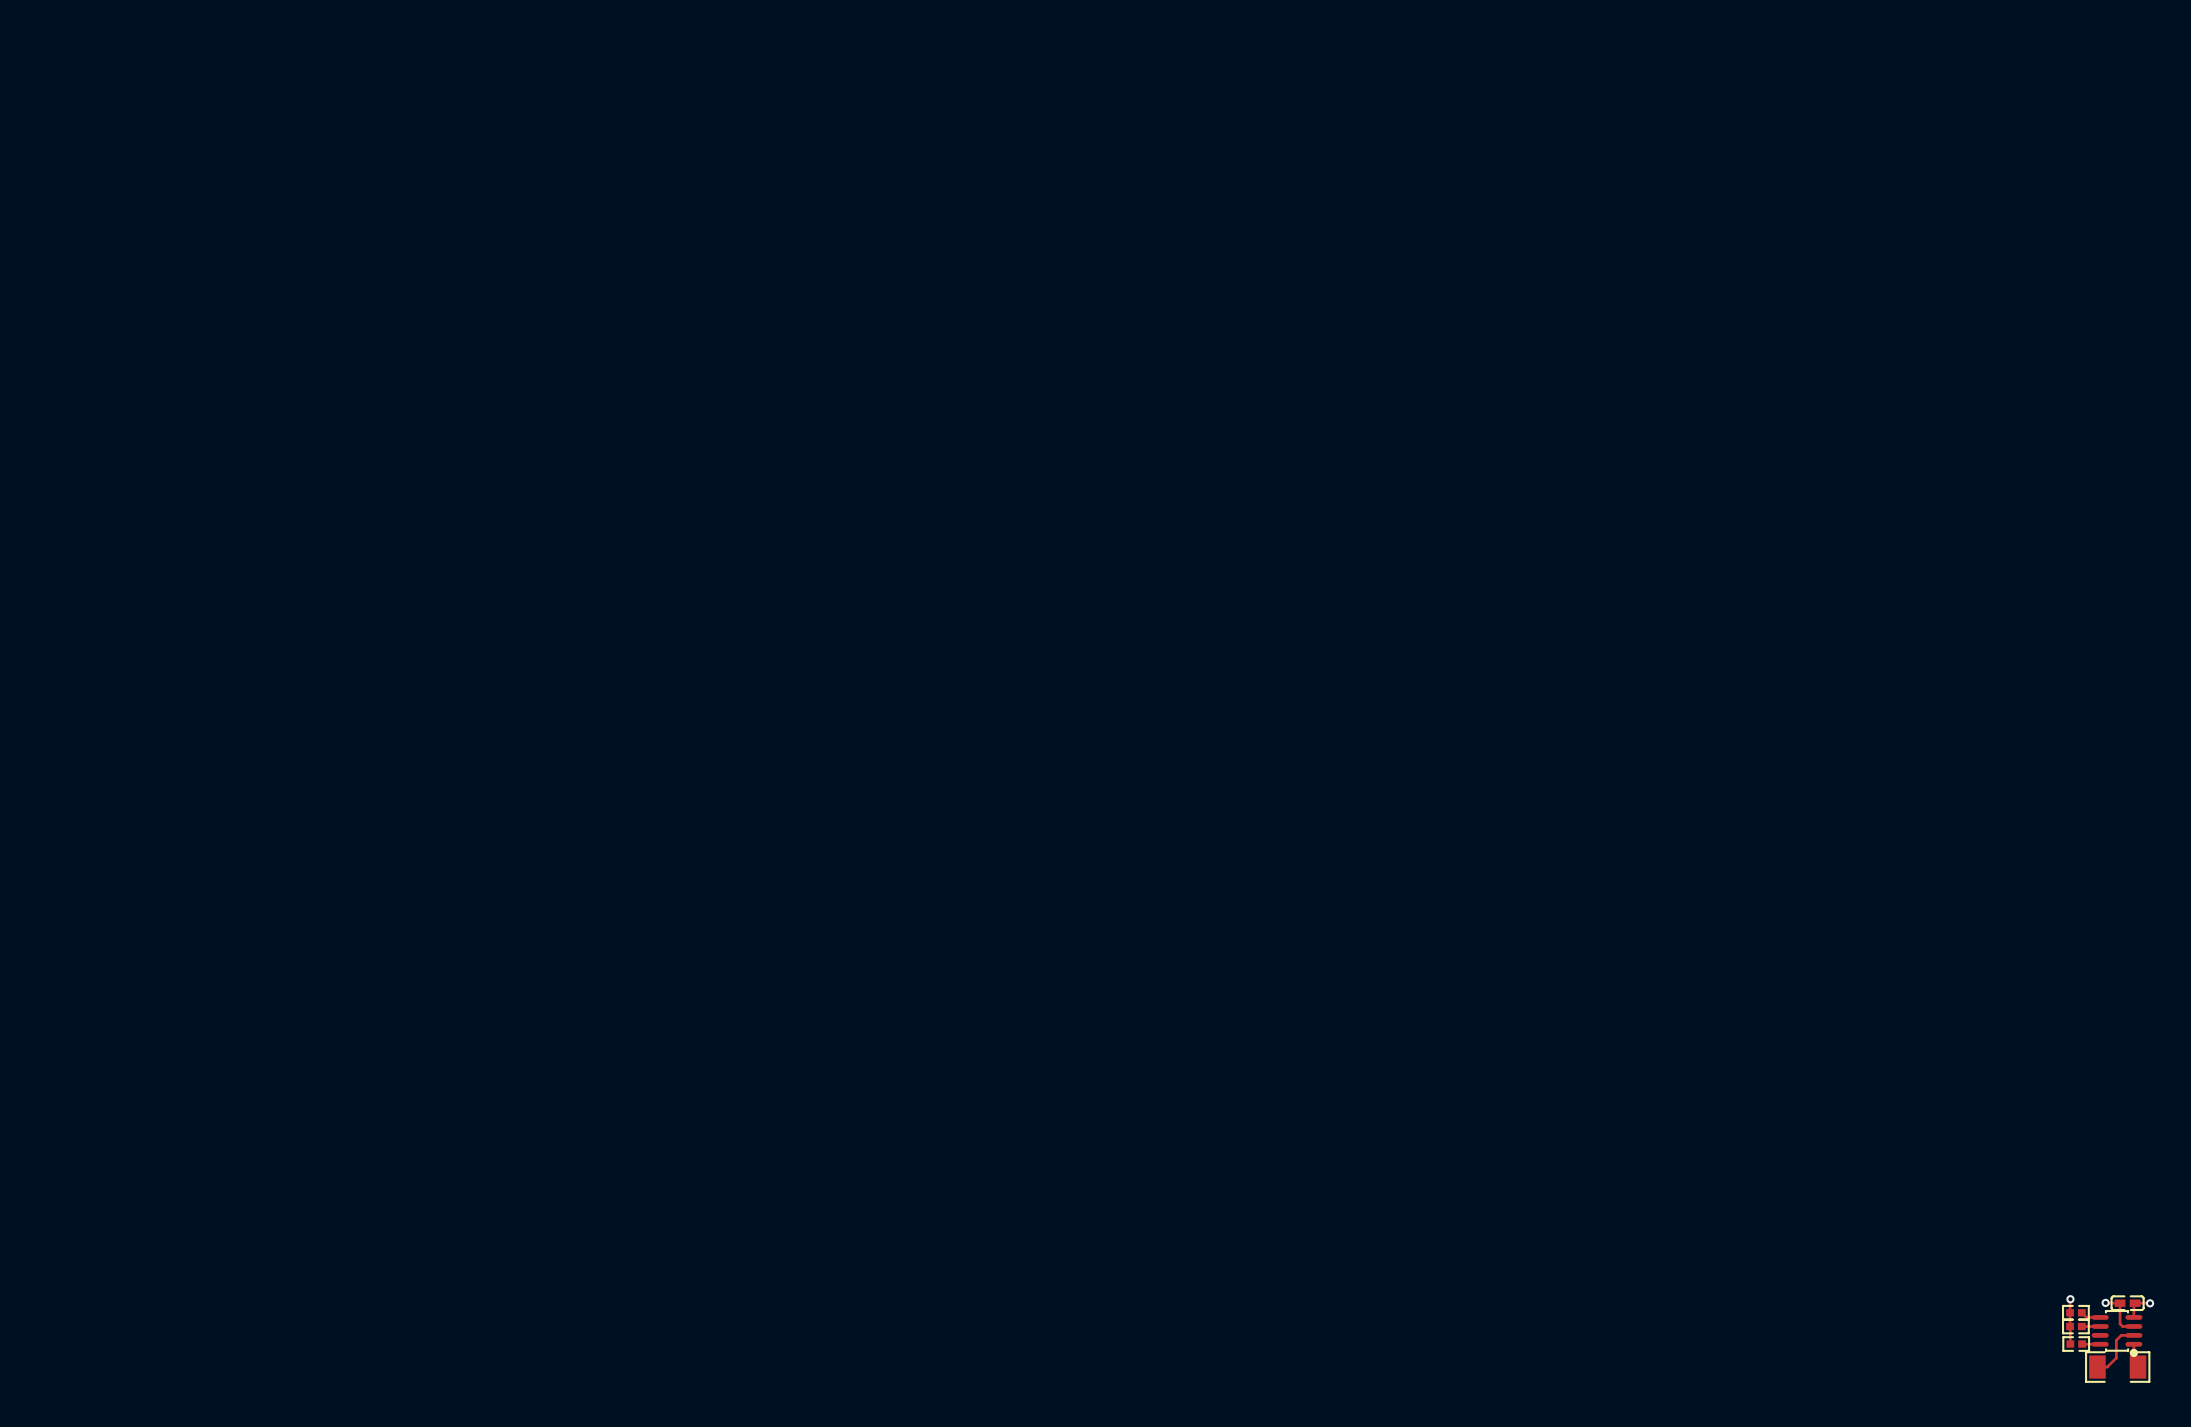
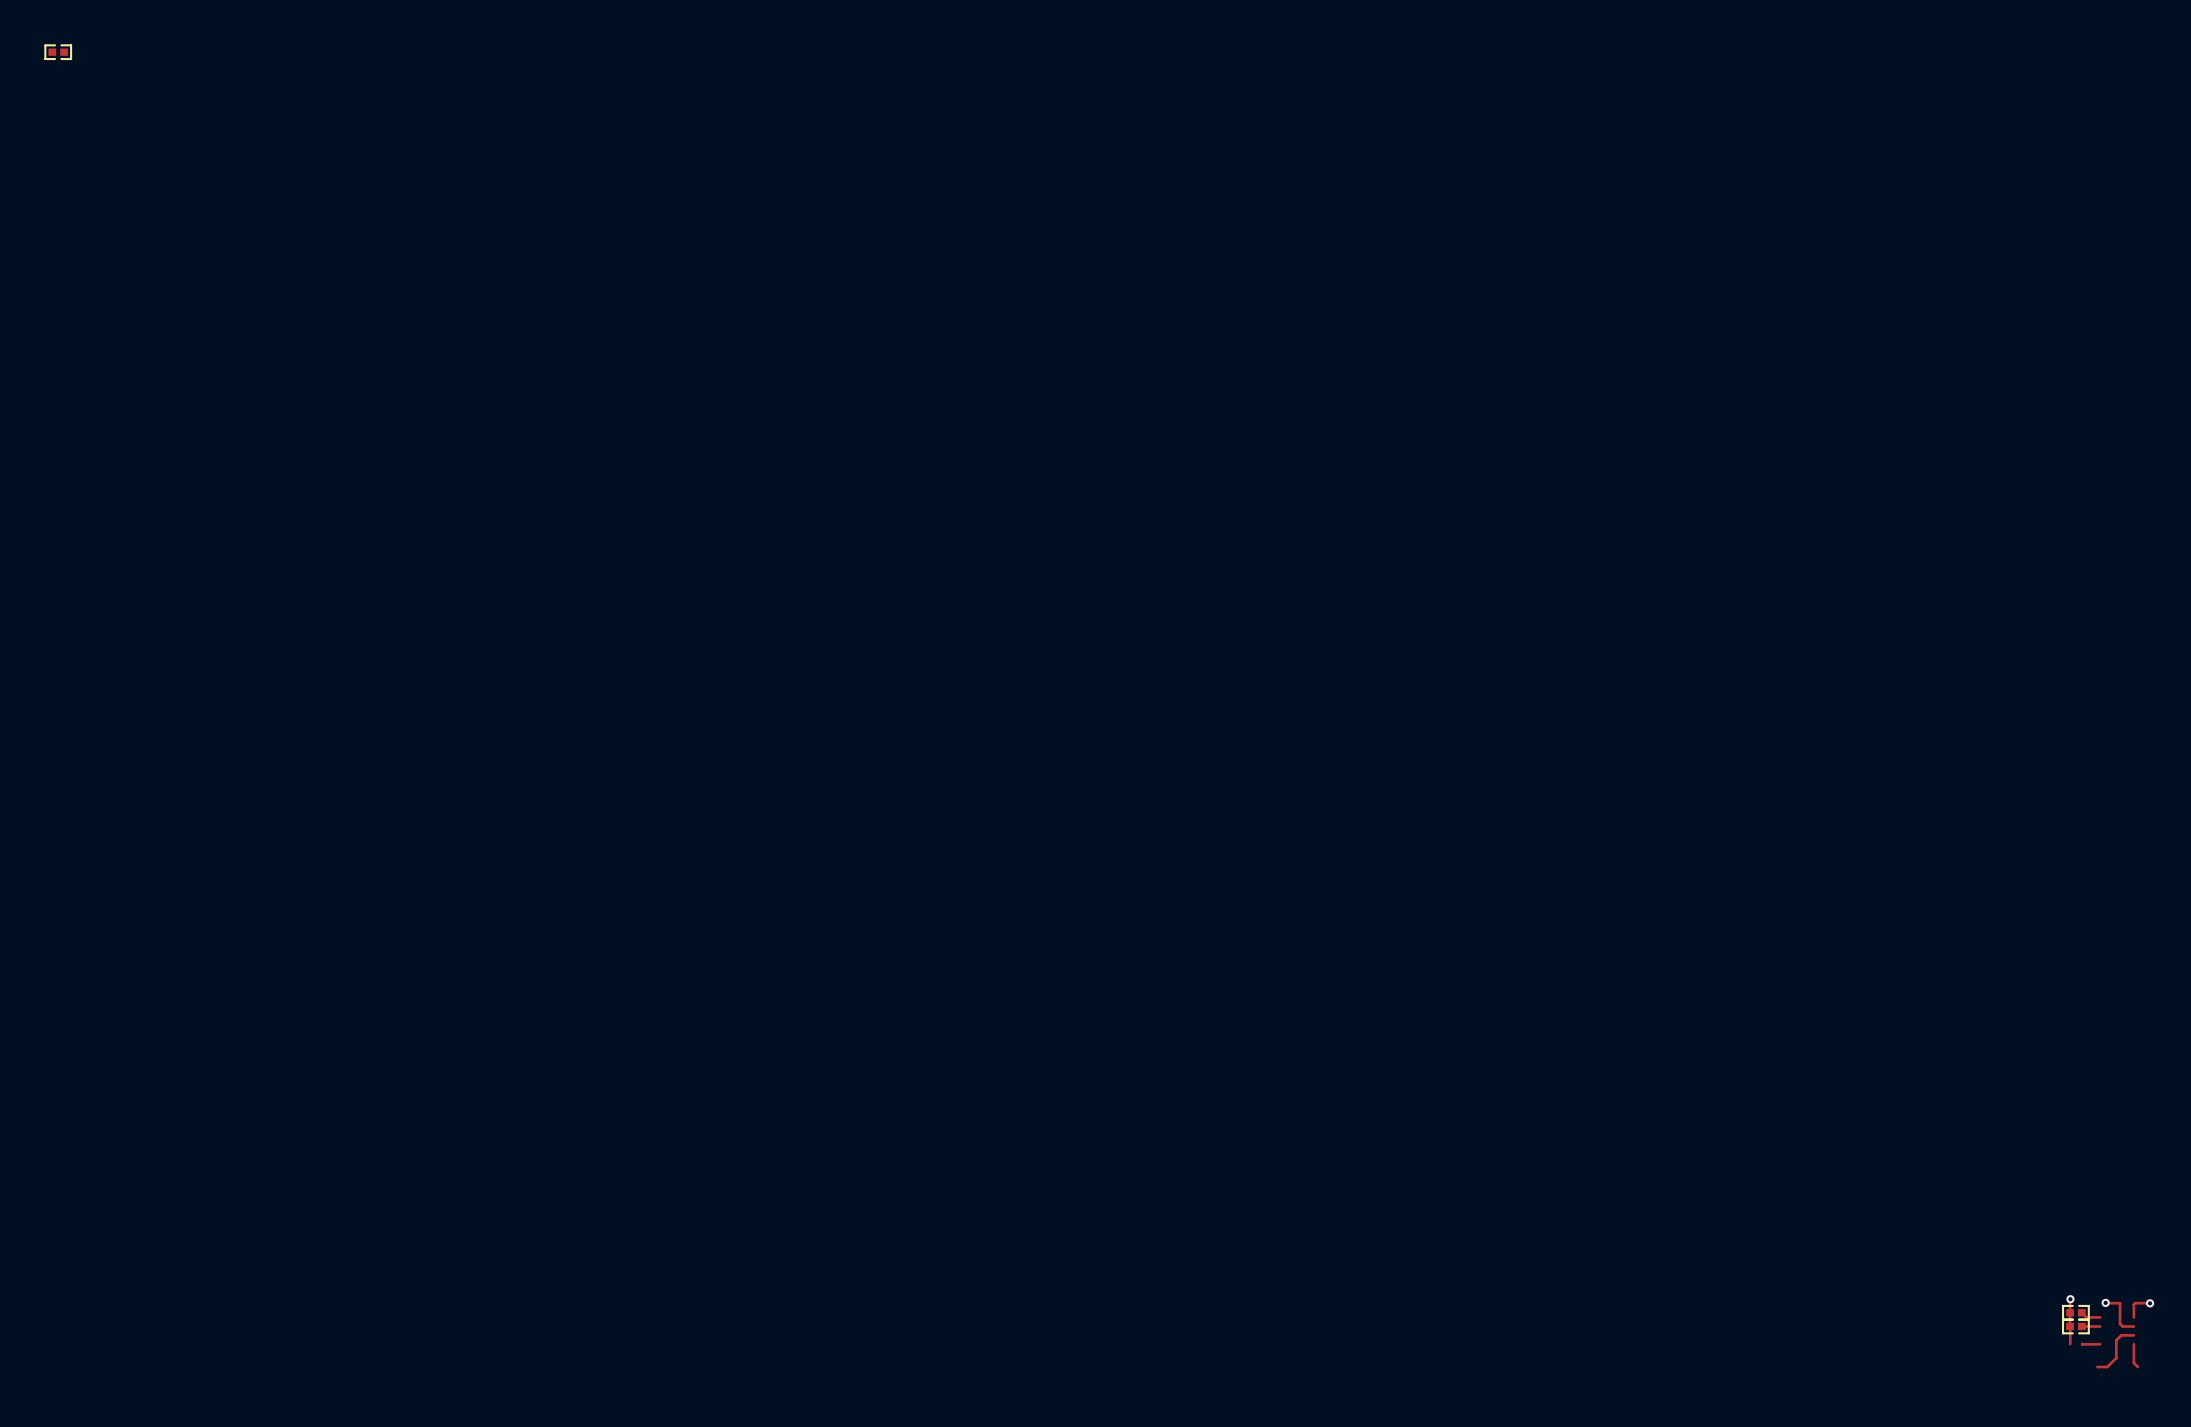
part: none -> (58, 52)
part: (2127, 1303) -> none
part: (2117, 1333) -> none
part: (2076, 1344) -> none
part: (2117, 1367) -> none

